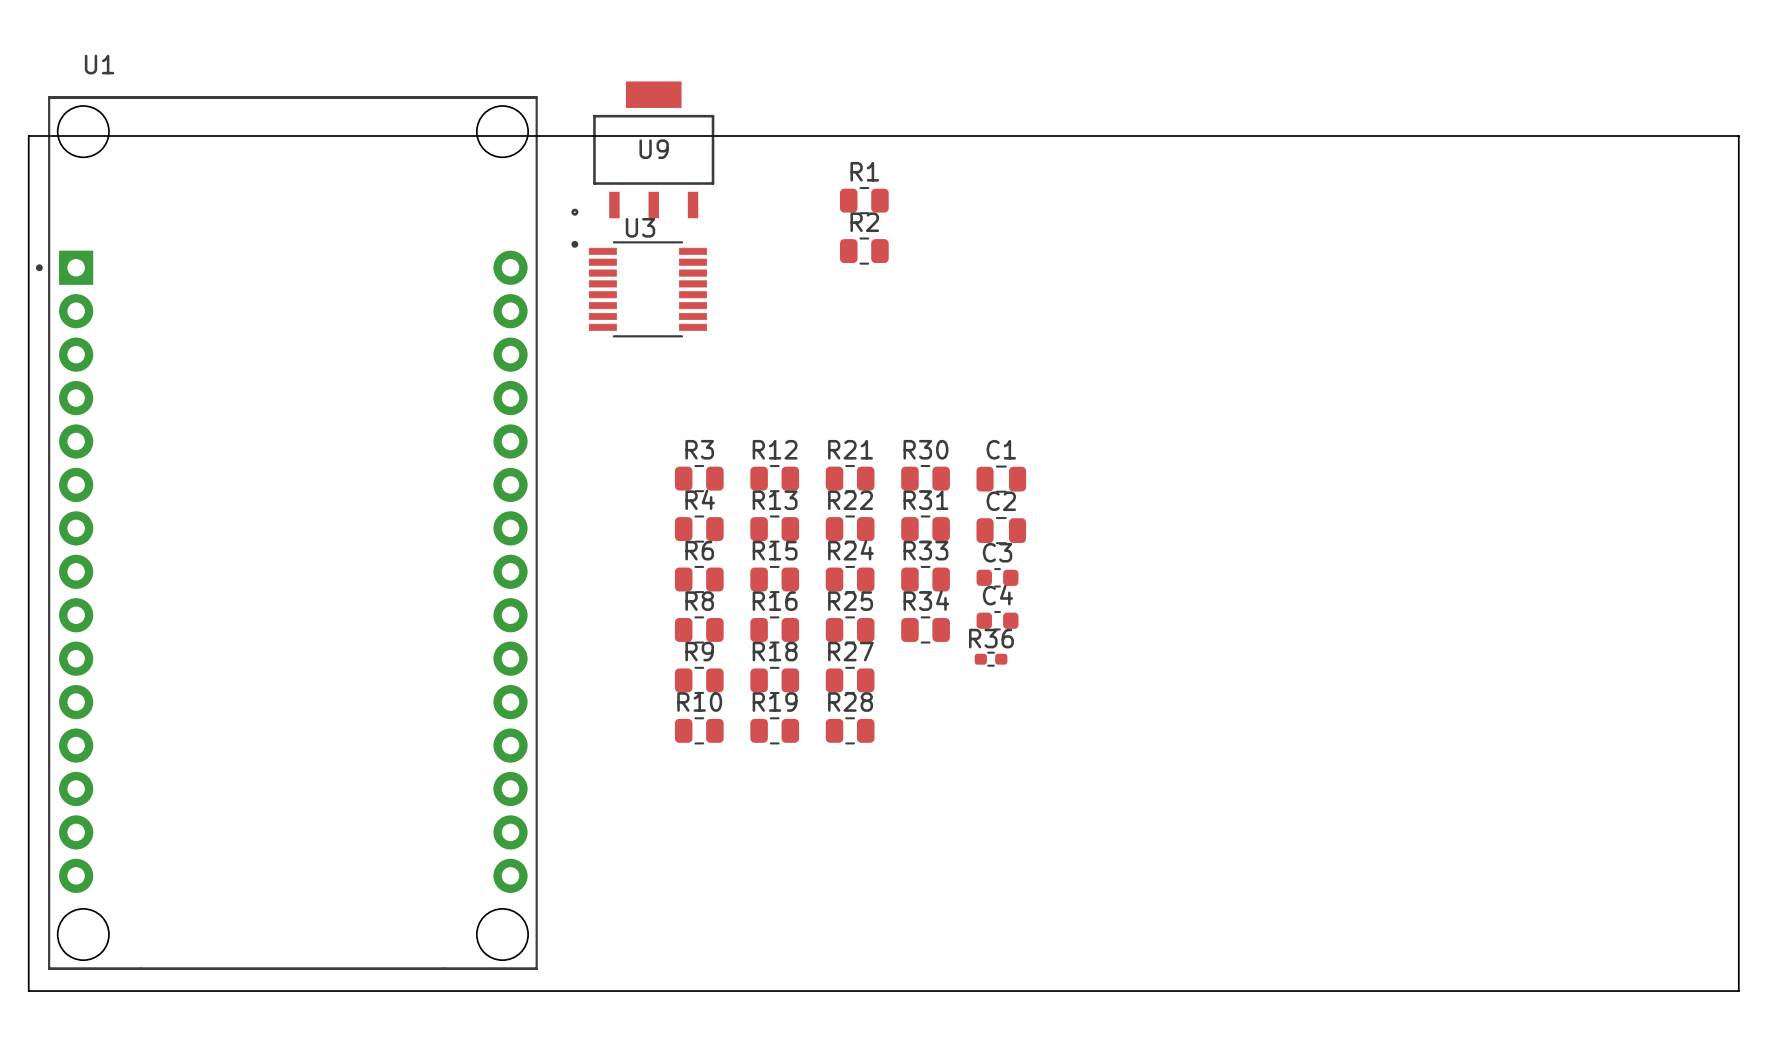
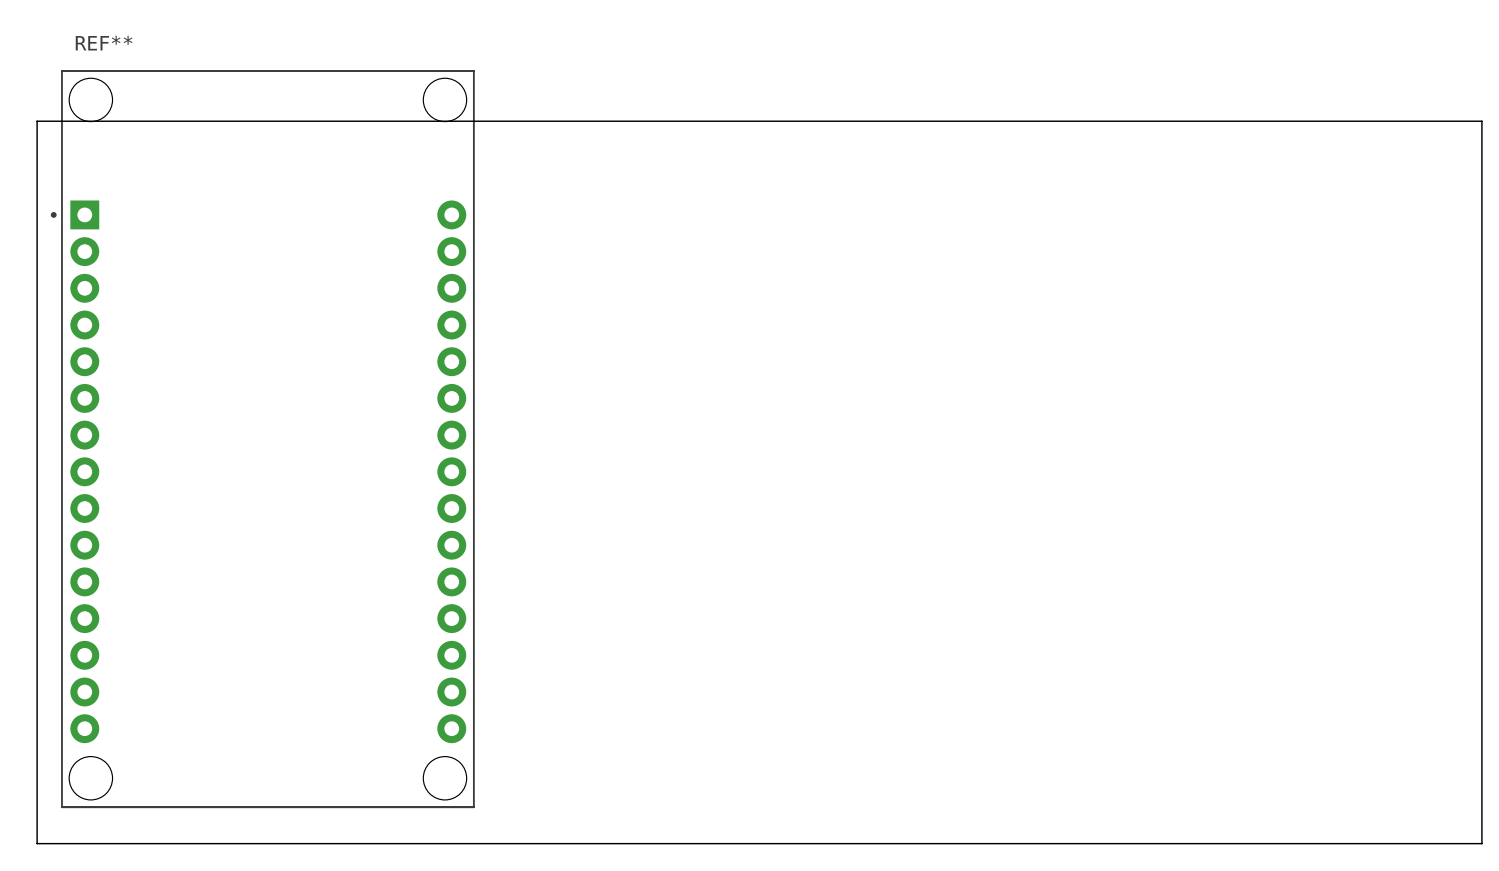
U9: (642, 149) -> none
R1: (864, 200) -> none
R2: (864, 251) -> none
U3: (639, 289) -> none
R3: (699, 478) -> none
R12: (774, 478) -> none
R21: (850, 478) -> none
R30: (925, 478) -> none
C1: (1001, 479) -> none
REF**: none -> (262, 439)
R4: (699, 529) -> none
R13: (774, 529) -> none
R22: (850, 529) -> none
R31: (925, 529) -> none
C2: (1001, 530) -> none
U1: (286, 533) -> none
C3: (997, 577) -> none
R6: (699, 579) -> none
R15: (774, 579) -> none
R24: (850, 579) -> none
R33: (925, 579) -> none
C4: (997, 620) -> none
R8: (699, 629) -> none
R16: (774, 629) -> none
R25: (850, 629) -> none
R34: (925, 629) -> none
R36: (991, 659) -> none
R9: (699, 680) -> none
R18: (774, 680) -> none
R27: (850, 680) -> none
R10: (699, 730) -> none
R19: (774, 730) -> none
R28: (850, 730) -> none

